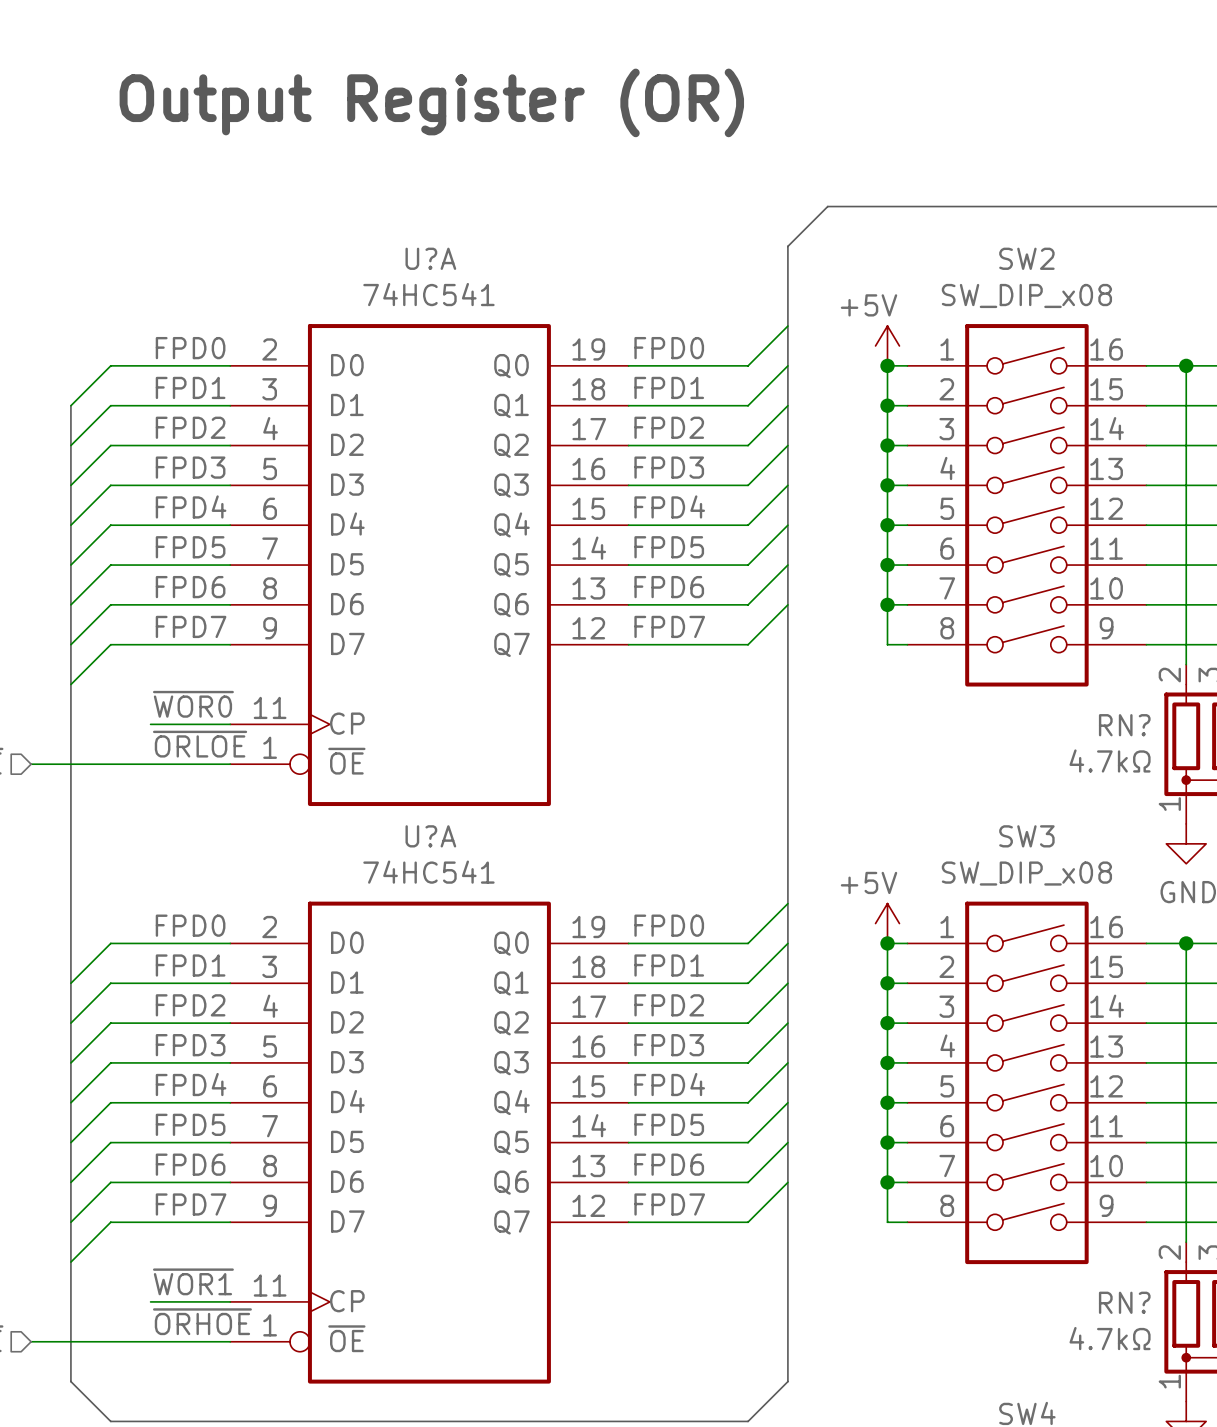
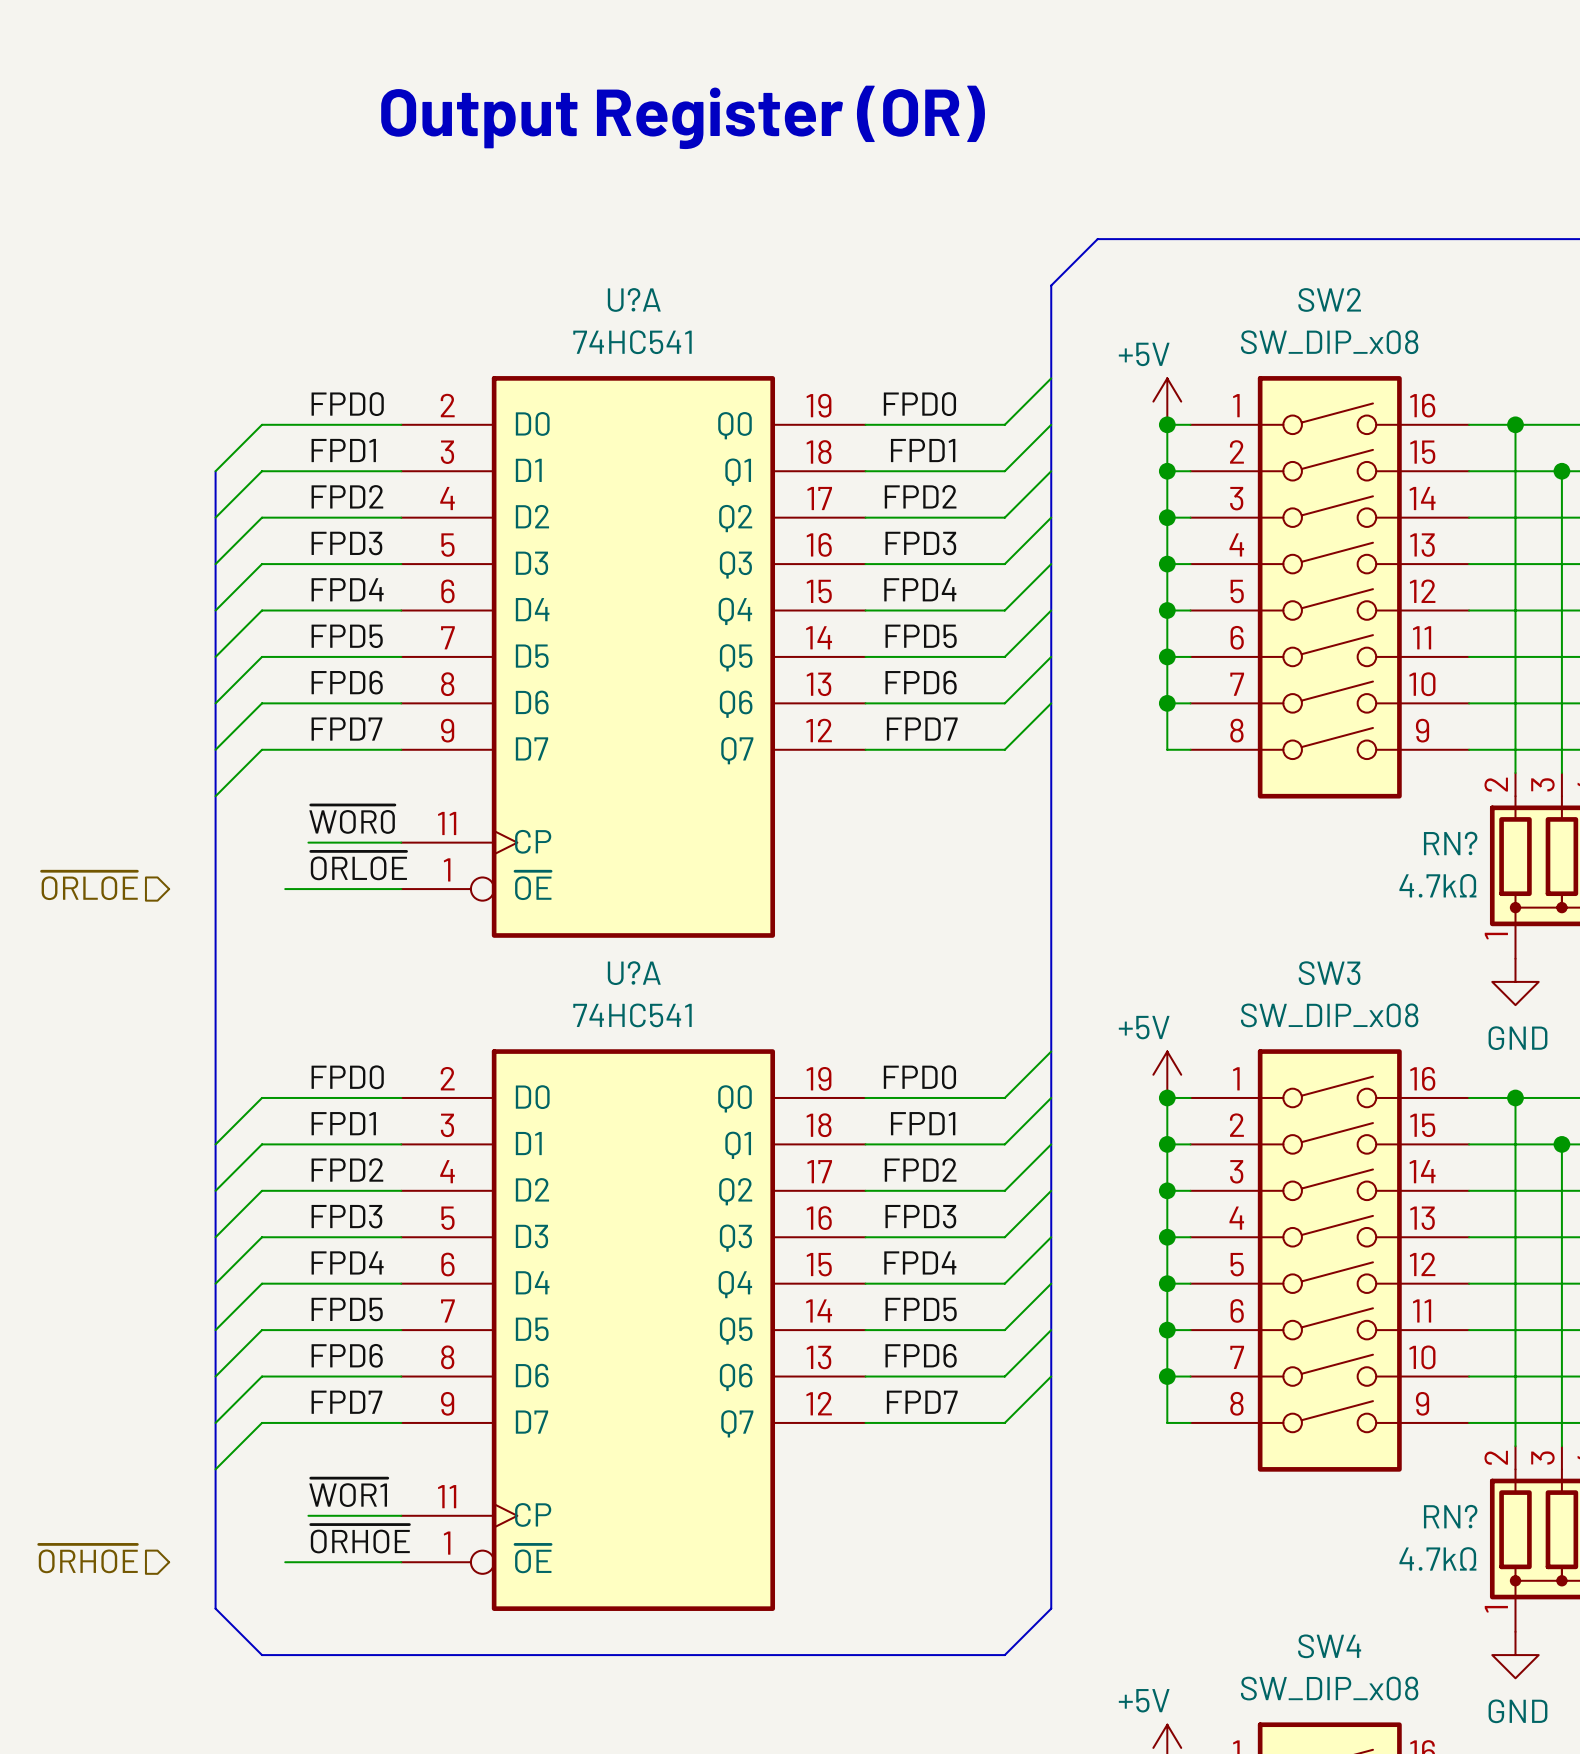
text position: Output Register (OR) (431, 102) -> Output Register (OR) (683, 117)
wire: (31, 764) (130, 764) -> none
wire: (31, 1341) (130, 1341) -> none

